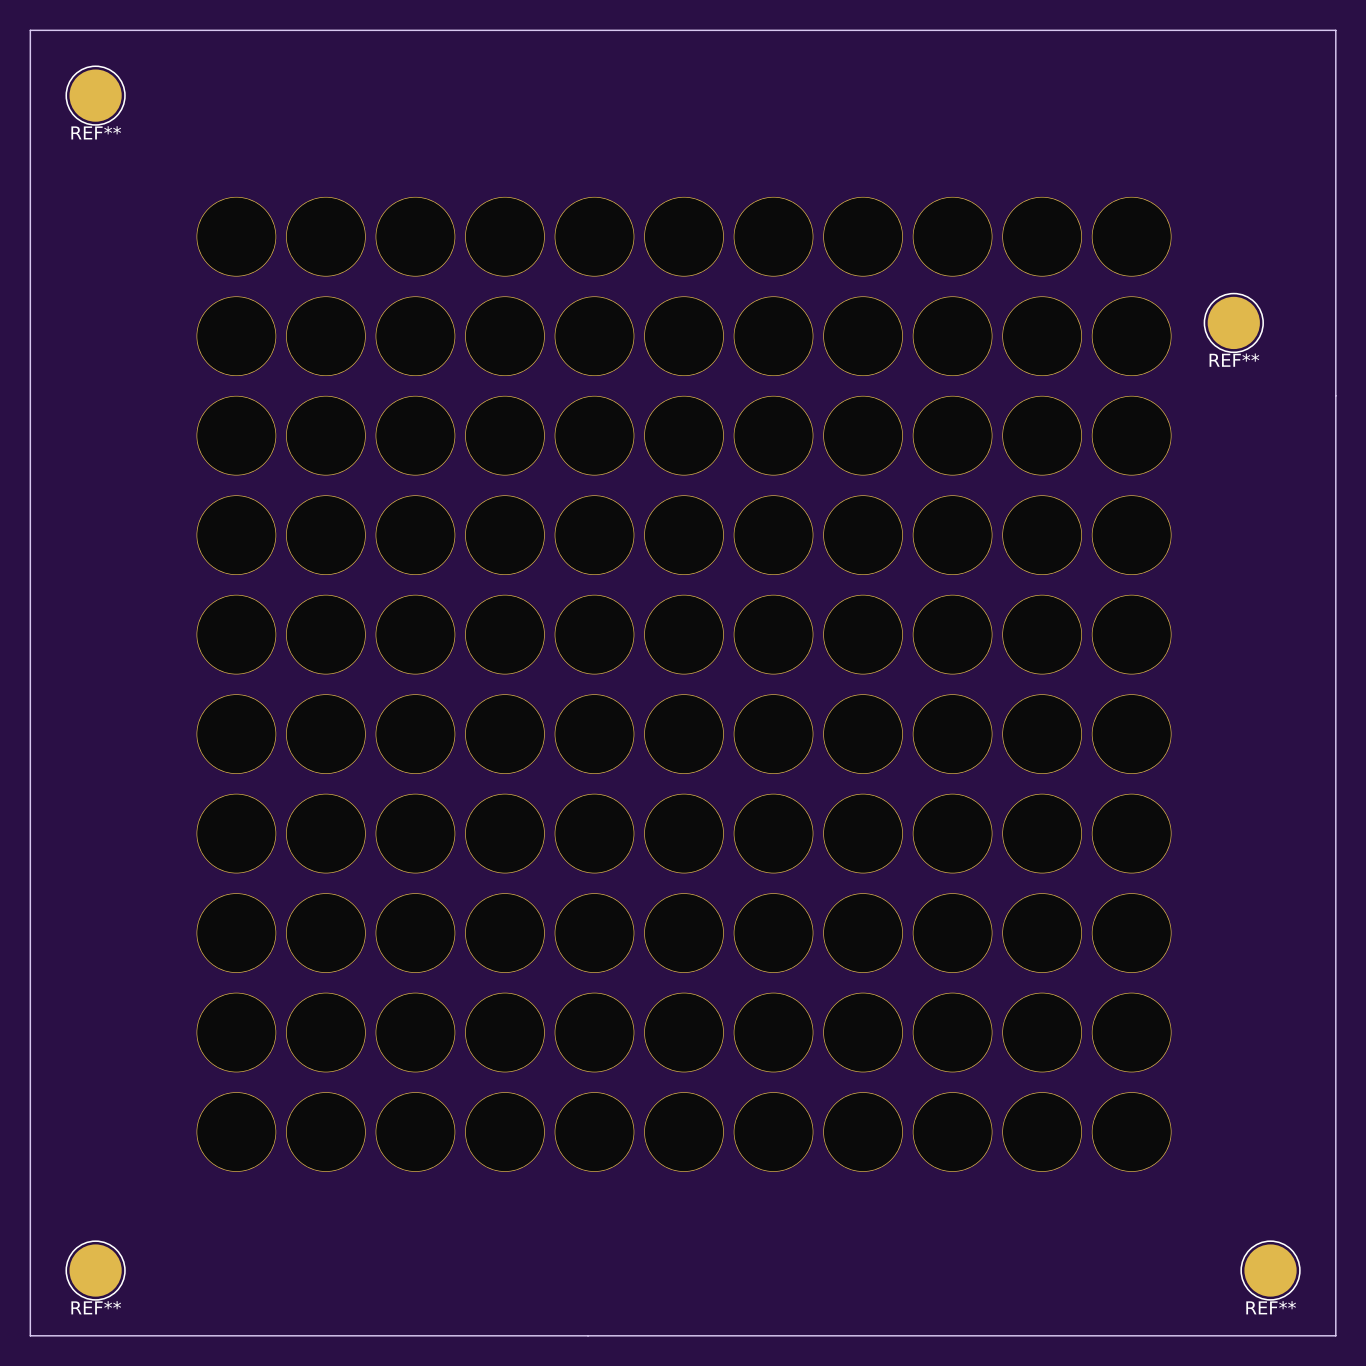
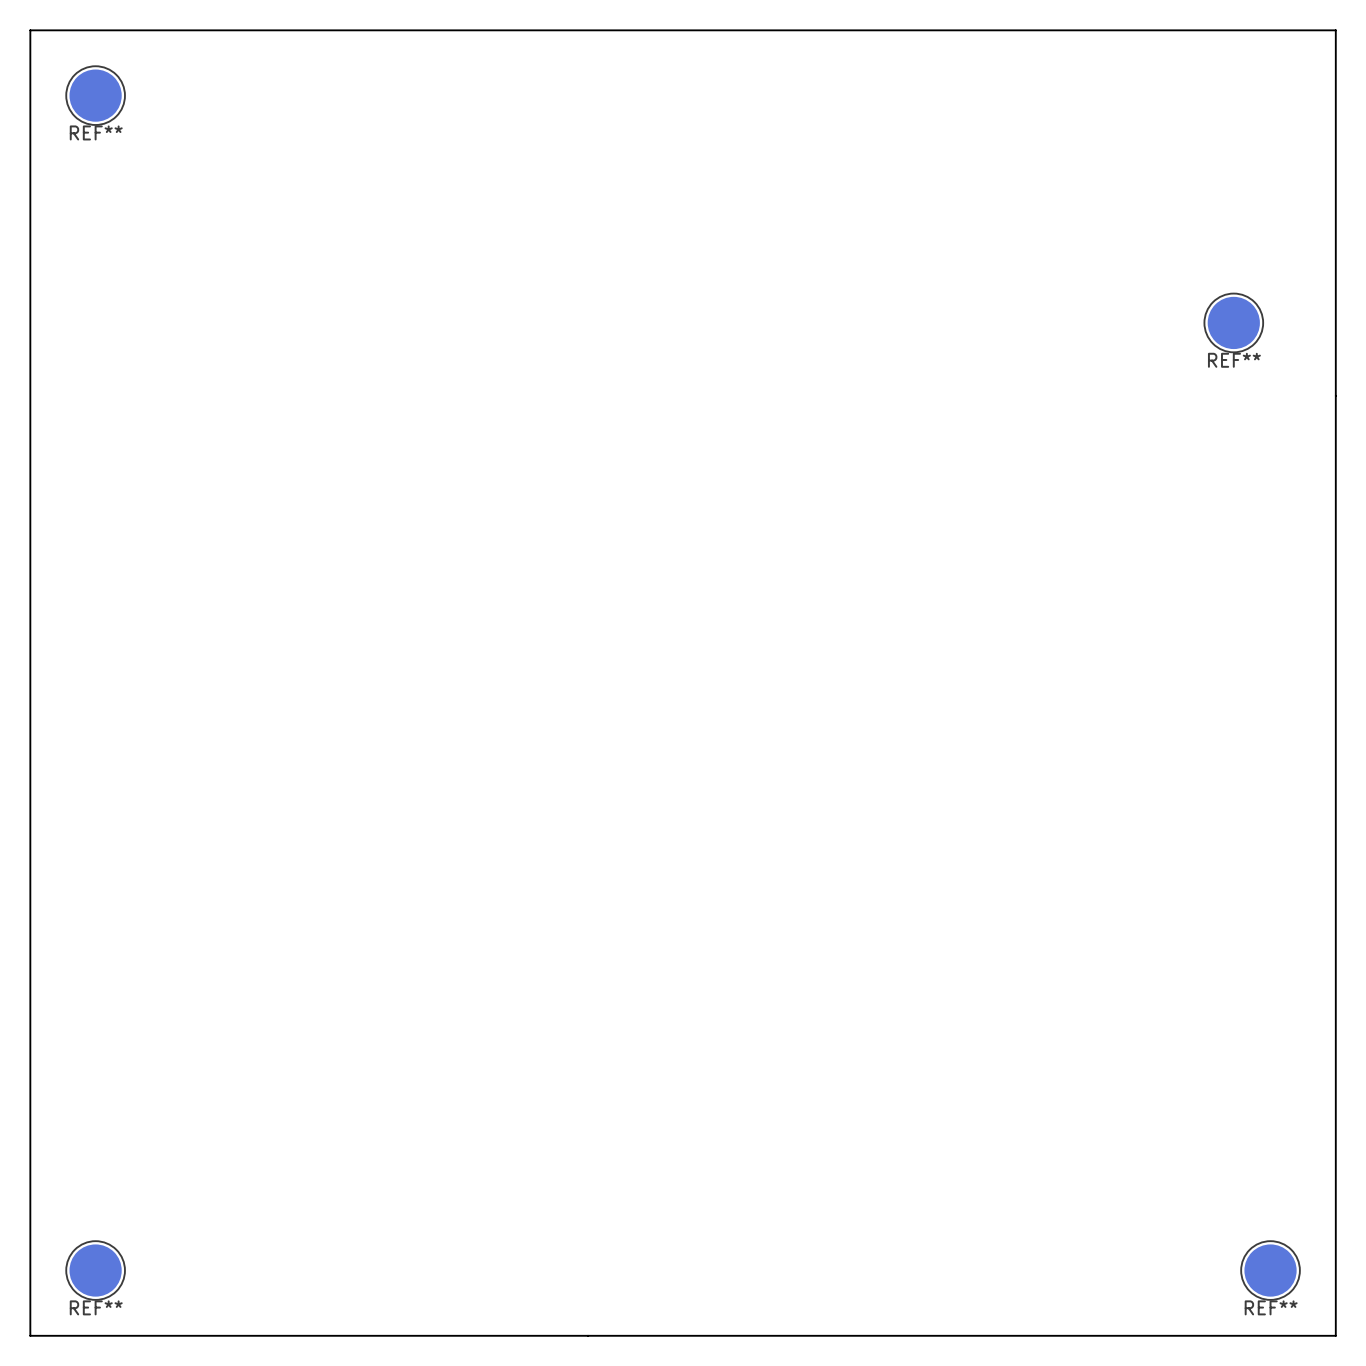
part: (236, 236) -> none
part: (325, 236) -> none
part: (415, 236) -> none
part: (504, 236) -> none
part: (594, 236) -> none
part: (684, 236) -> none
part: (773, 236) -> none
part: (863, 236) -> none
part: (952, 236) -> none
part: (1042, 236) -> none
part: (1131, 236) -> none
part: (236, 336) -> none
part: (325, 336) -> none
part: (415, 336) -> none
part: (504, 336) -> none
part: (594, 336) -> none
part: (684, 336) -> none
part: (773, 336) -> none
part: (863, 336) -> none
part: (952, 336) -> none
part: (1042, 336) -> none
part: (1131, 336) -> none
part: (236, 435) -> none
part: (325, 435) -> none
part: (415, 435) -> none
part: (504, 435) -> none
part: (594, 435) -> none
part: (684, 435) -> none
part: (773, 435) -> none
part: (863, 435) -> none
part: (952, 435) -> none
part: (1042, 435) -> none
part: (1131, 435) -> none
part: (236, 535) -> none
part: (325, 535) -> none
part: (415, 535) -> none
part: (504, 535) -> none
part: (594, 535) -> none
part: (684, 535) -> none
part: (773, 535) -> none
part: (863, 535) -> none
part: (952, 535) -> none
part: (1042, 535) -> none
part: (1131, 535) -> none
part: (236, 634) -> none
part: (325, 634) -> none
part: (415, 634) -> none
part: (504, 634) -> none
part: (594, 634) -> none
part: (684, 634) -> none
part: (773, 634) -> none
part: (863, 634) -> none
part: (952, 634) -> none
part: (1042, 634) -> none
part: (1131, 634) -> none
part: (236, 734) -> none
part: (325, 734) -> none
part: (415, 734) -> none
part: (504, 734) -> none
part: (594, 734) -> none
part: (684, 734) -> none
part: (773, 734) -> none
part: (863, 734) -> none
part: (952, 734) -> none
part: (1042, 734) -> none
part: (1131, 734) -> none
part: (236, 833) -> none
part: (325, 833) -> none
part: (415, 833) -> none
part: (504, 833) -> none
part: (594, 833) -> none
part: (684, 833) -> none
part: (773, 833) -> none
part: (863, 833) -> none
part: (952, 833) -> none
part: (1042, 833) -> none
part: (1131, 833) -> none
part: (236, 933) -> none
part: (325, 933) -> none
part: (415, 933) -> none
part: (504, 933) -> none
part: (594, 933) -> none
part: (684, 933) -> none
part: (773, 933) -> none
part: (863, 933) -> none
part: (952, 933) -> none
part: (1042, 933) -> none
part: (1131, 933) -> none
part: (236, 1032) -> none
part: (325, 1032) -> none
part: (415, 1032) -> none
part: (504, 1032) -> none
part: (594, 1032) -> none
part: (684, 1032) -> none
part: (773, 1032) -> none
part: (863, 1032) -> none
part: (952, 1032) -> none
part: (1042, 1032) -> none
part: (1131, 1032) -> none
part: (236, 1132) -> none
part: (325, 1132) -> none
part: (415, 1132) -> none
part: (504, 1132) -> none
part: (594, 1132) -> none
part: (684, 1132) -> none
part: (773, 1132) -> none
part: (863, 1132) -> none
part: (952, 1132) -> none
part: (1042, 1132) -> none
part: (1131, 1132) -> none

